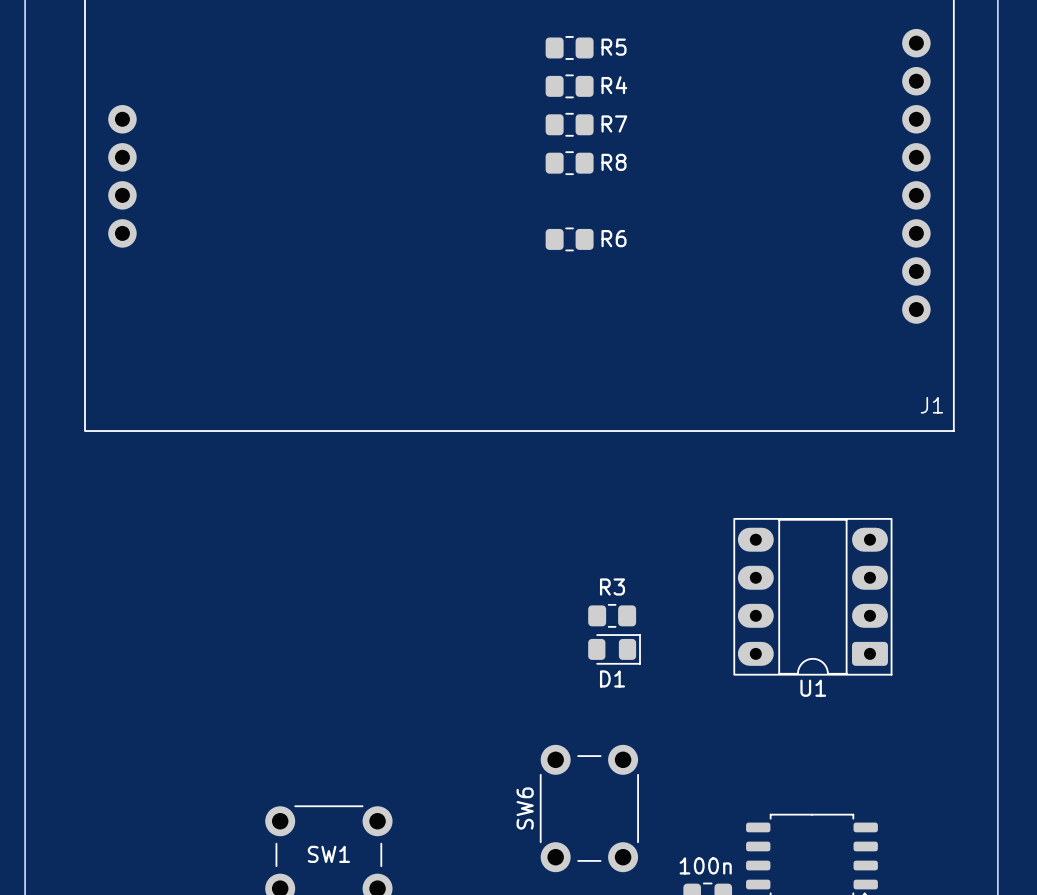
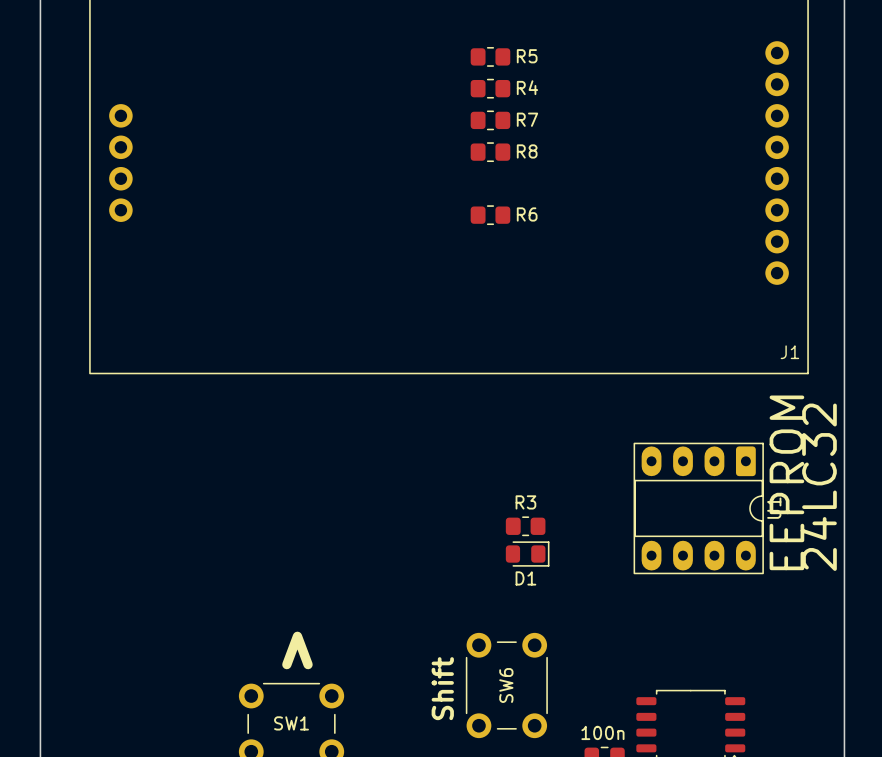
text: none -> EEPROM (786, 482)
text: none -> 24LC32 (818, 487)
U1 rotation: 0° (812, 596) -> 90° counterclockwise (698, 508)
text: none -> > (297, 650)
SW6 name position: SW6 (525, 808) -> SW6 (506, 685)
text: none -> Shift (442, 688)

